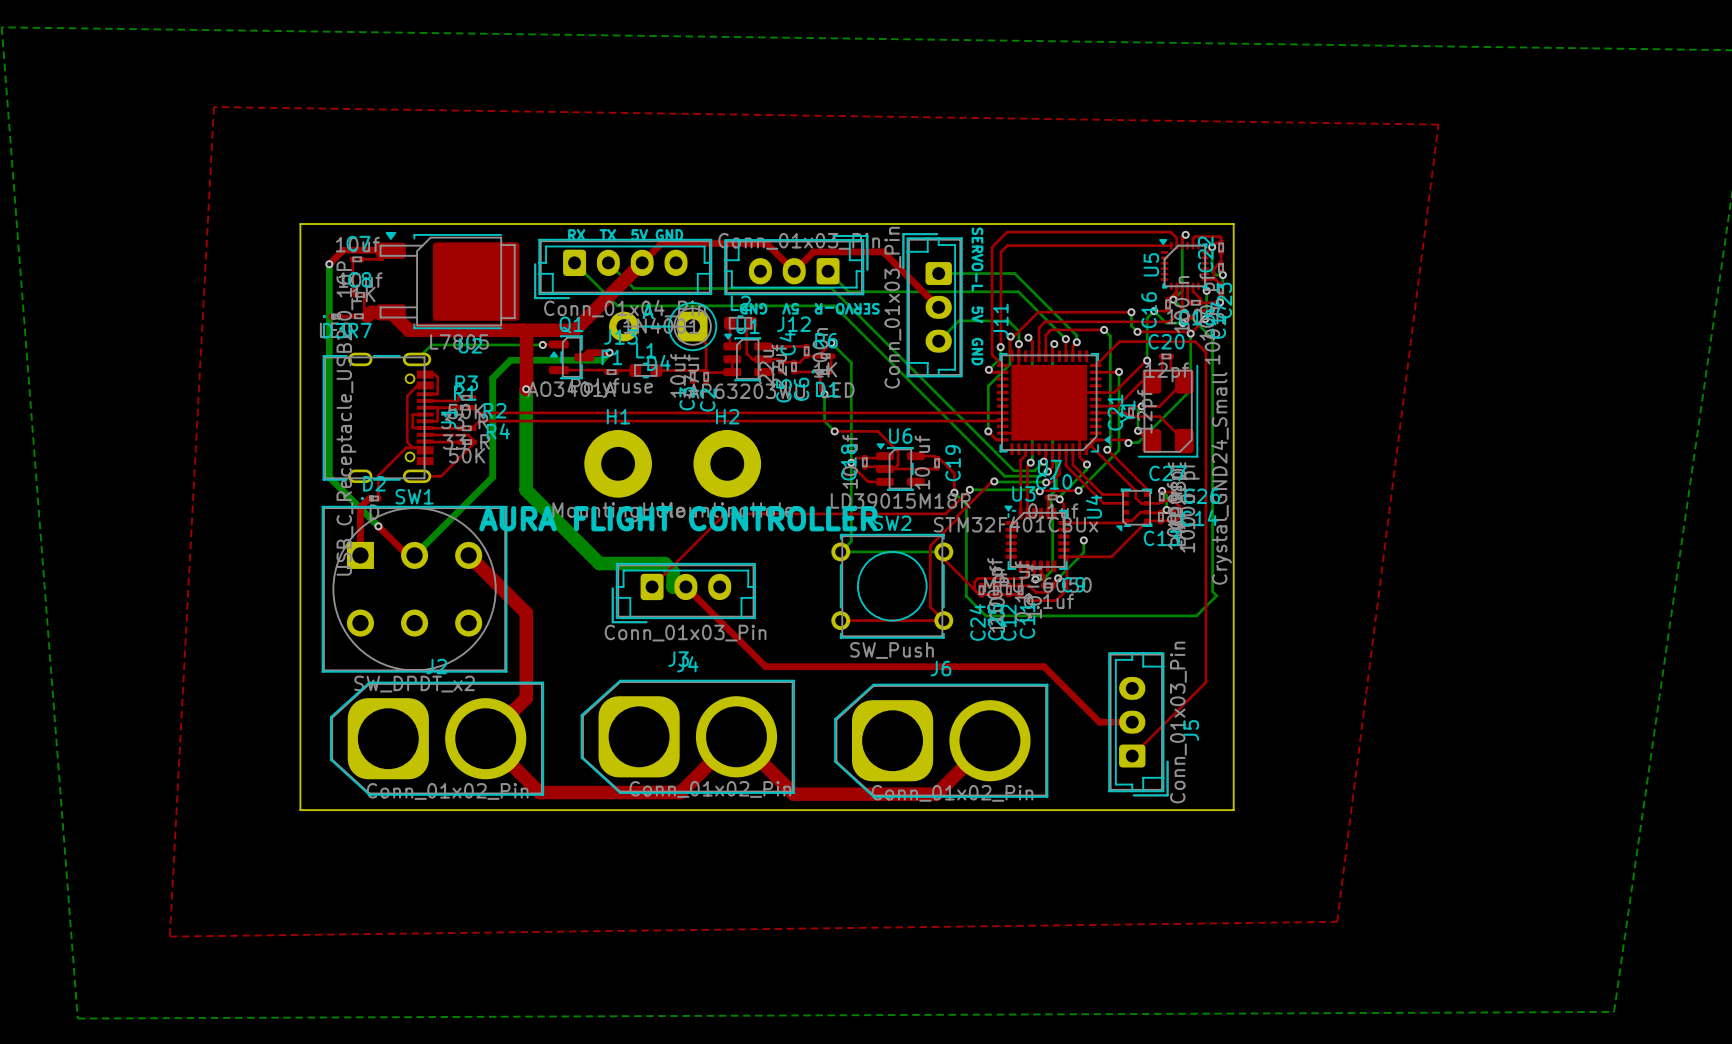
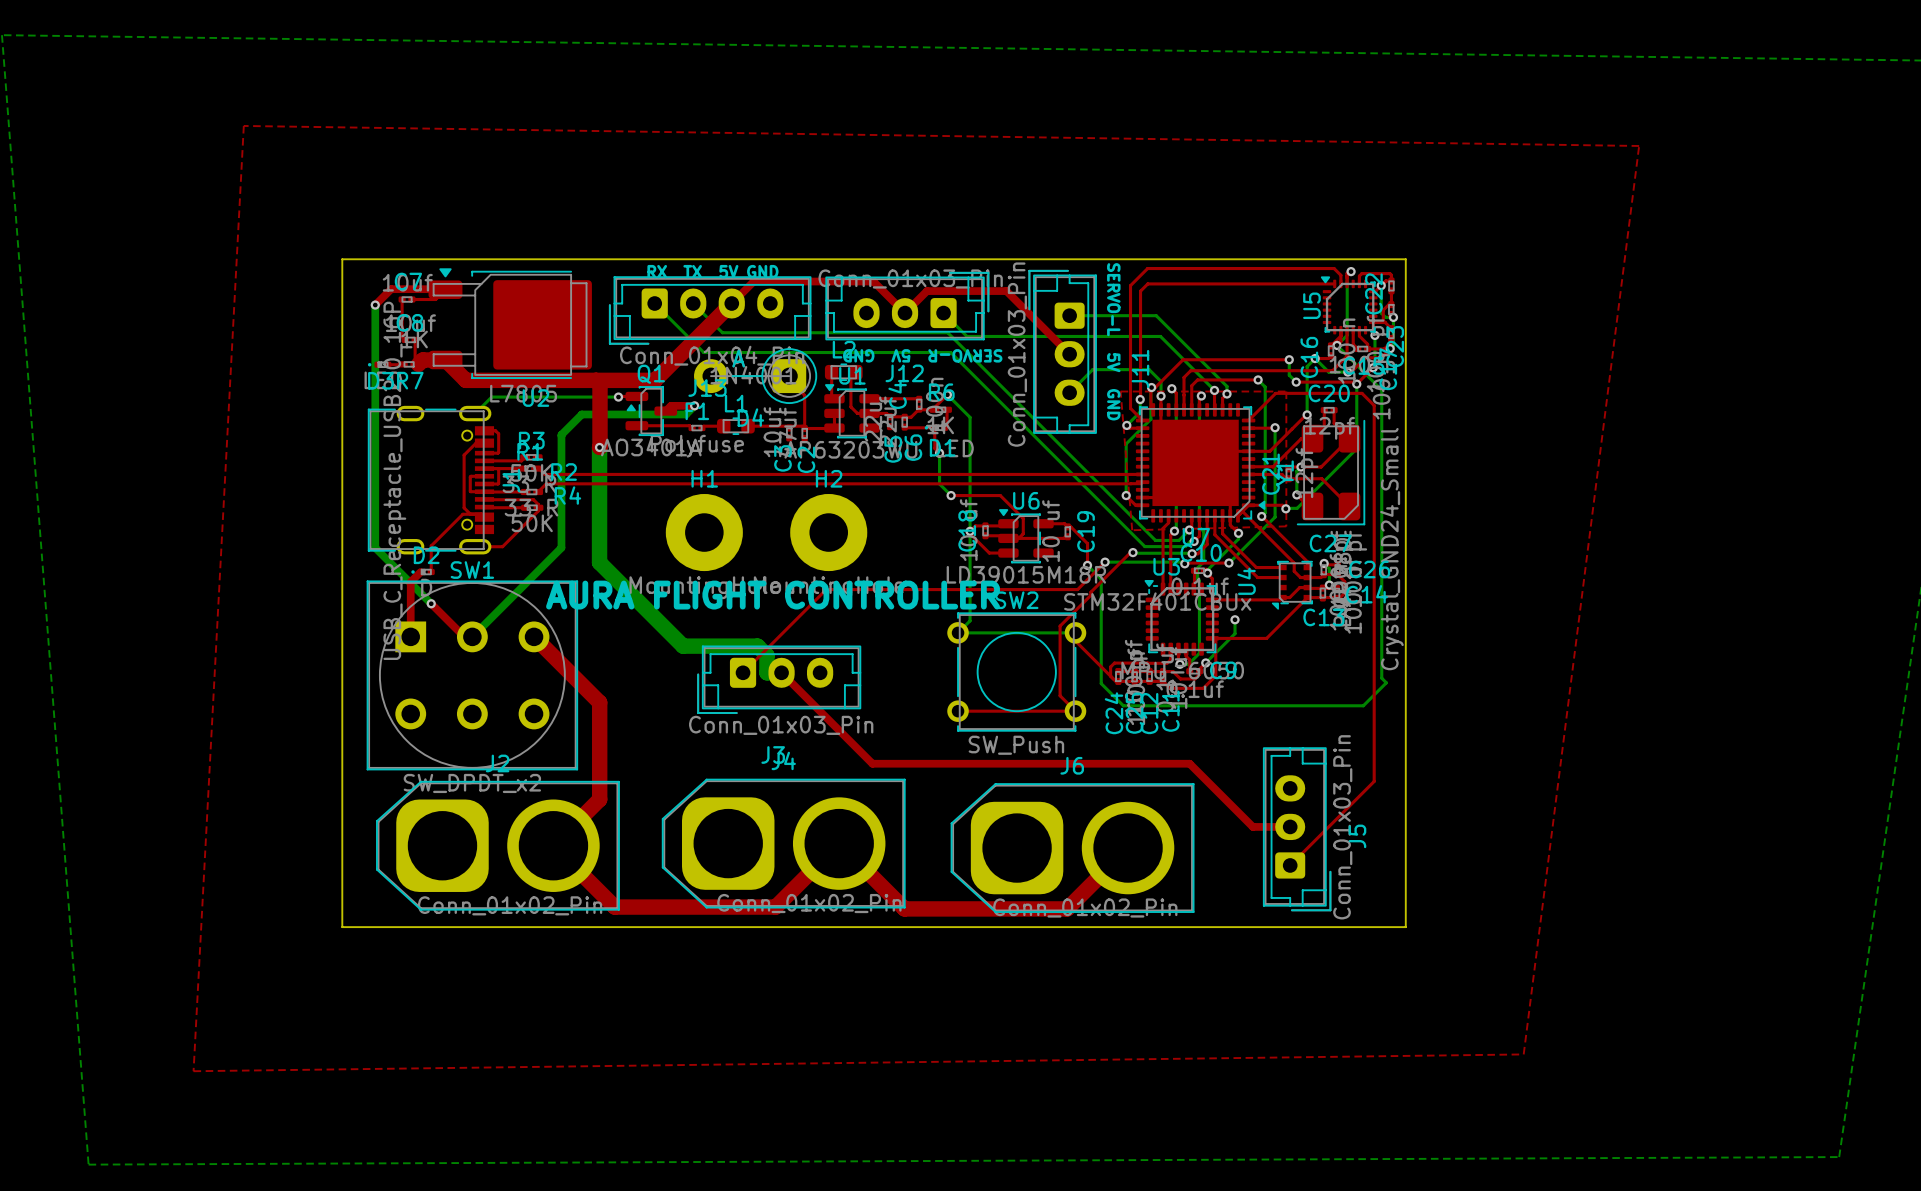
top zone outline: none -> (1120, 391) (1286, 391) (1286, 526) (1132, 530) (1120, 391)

